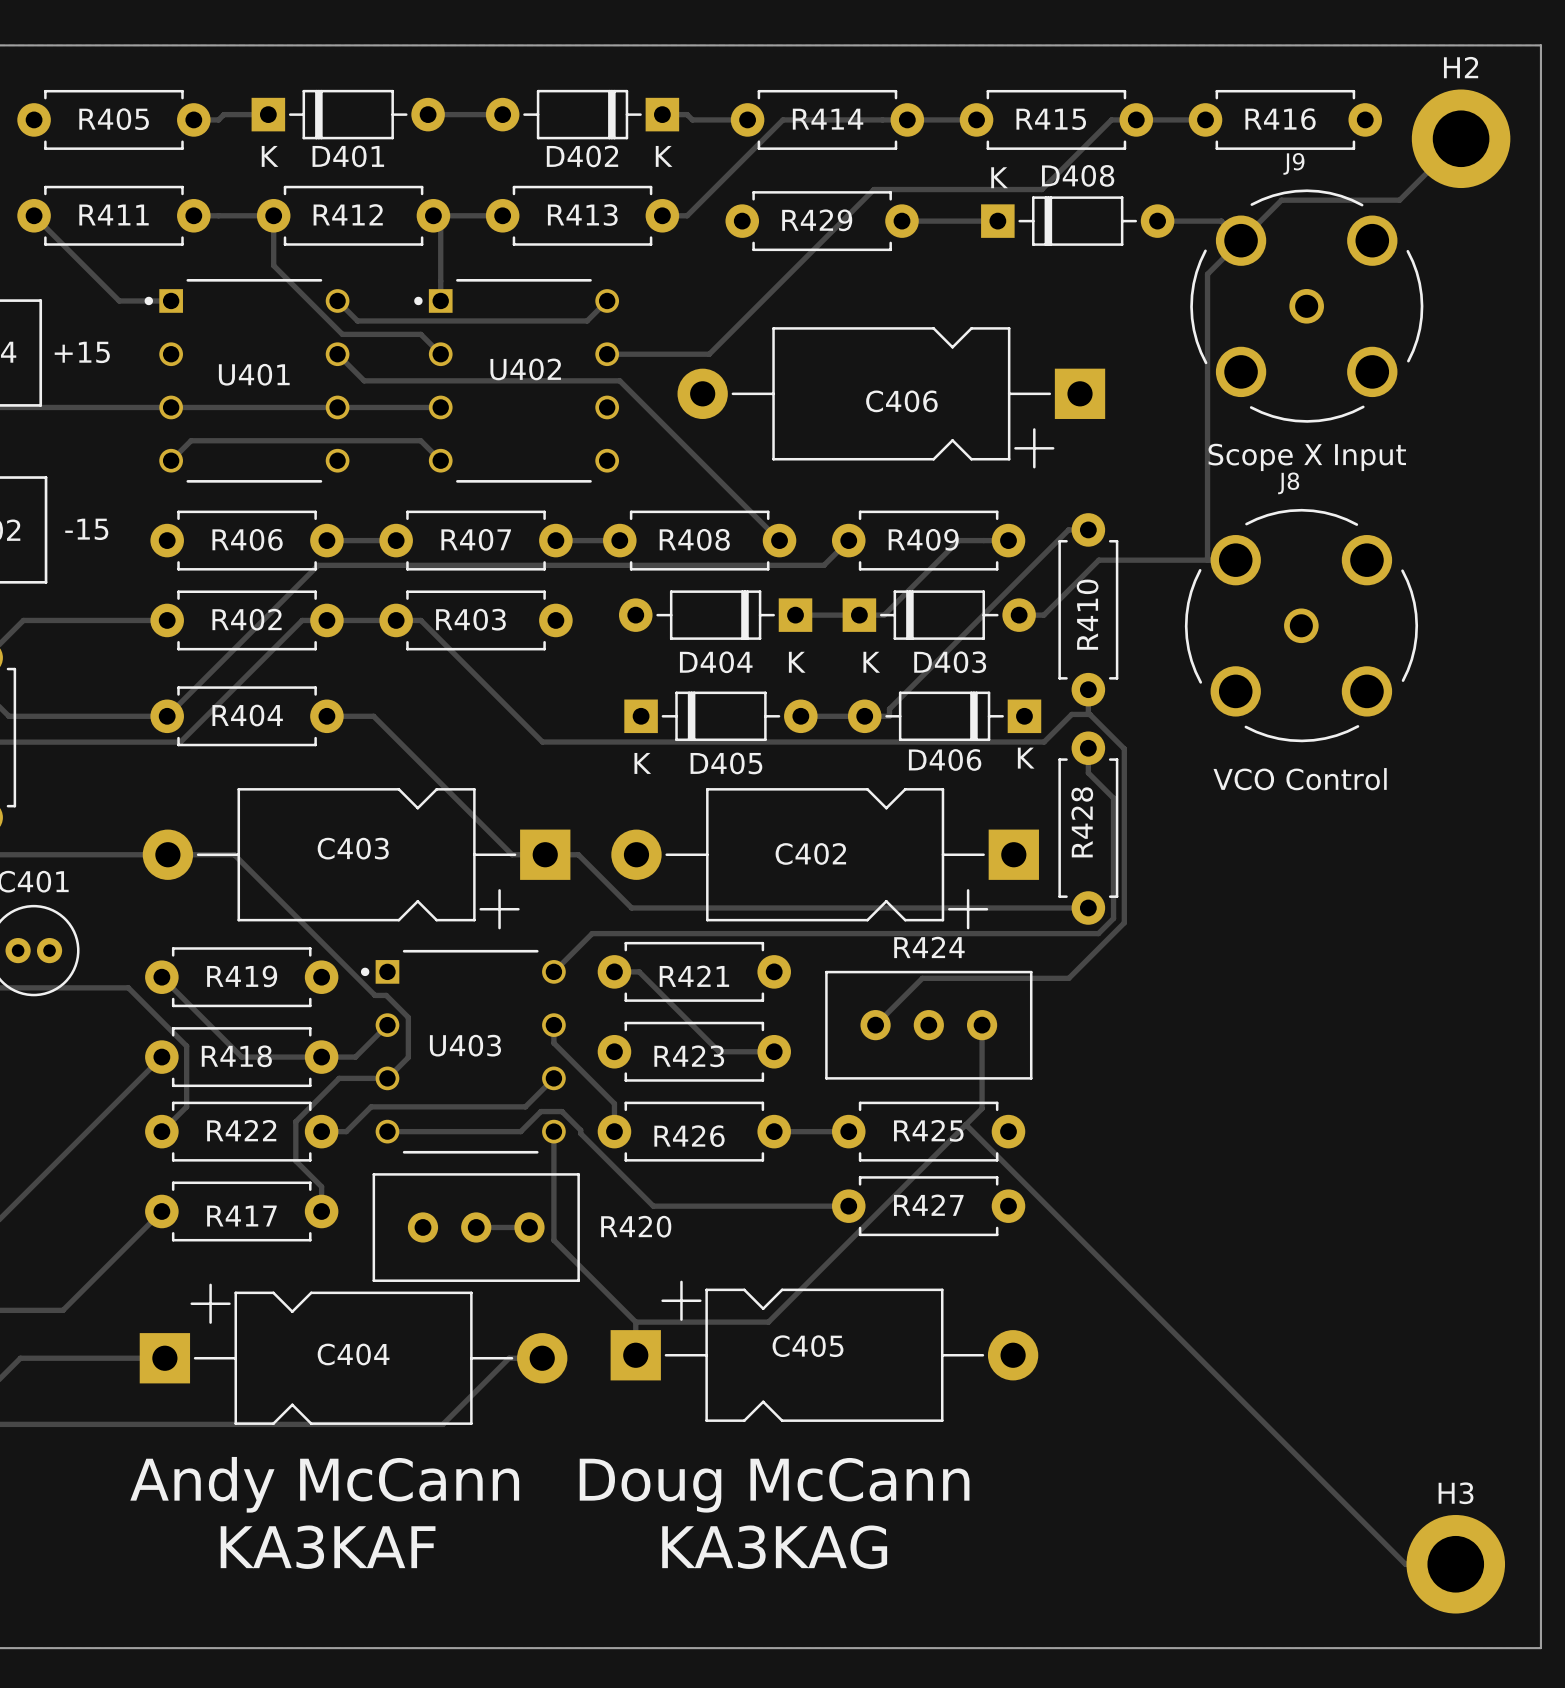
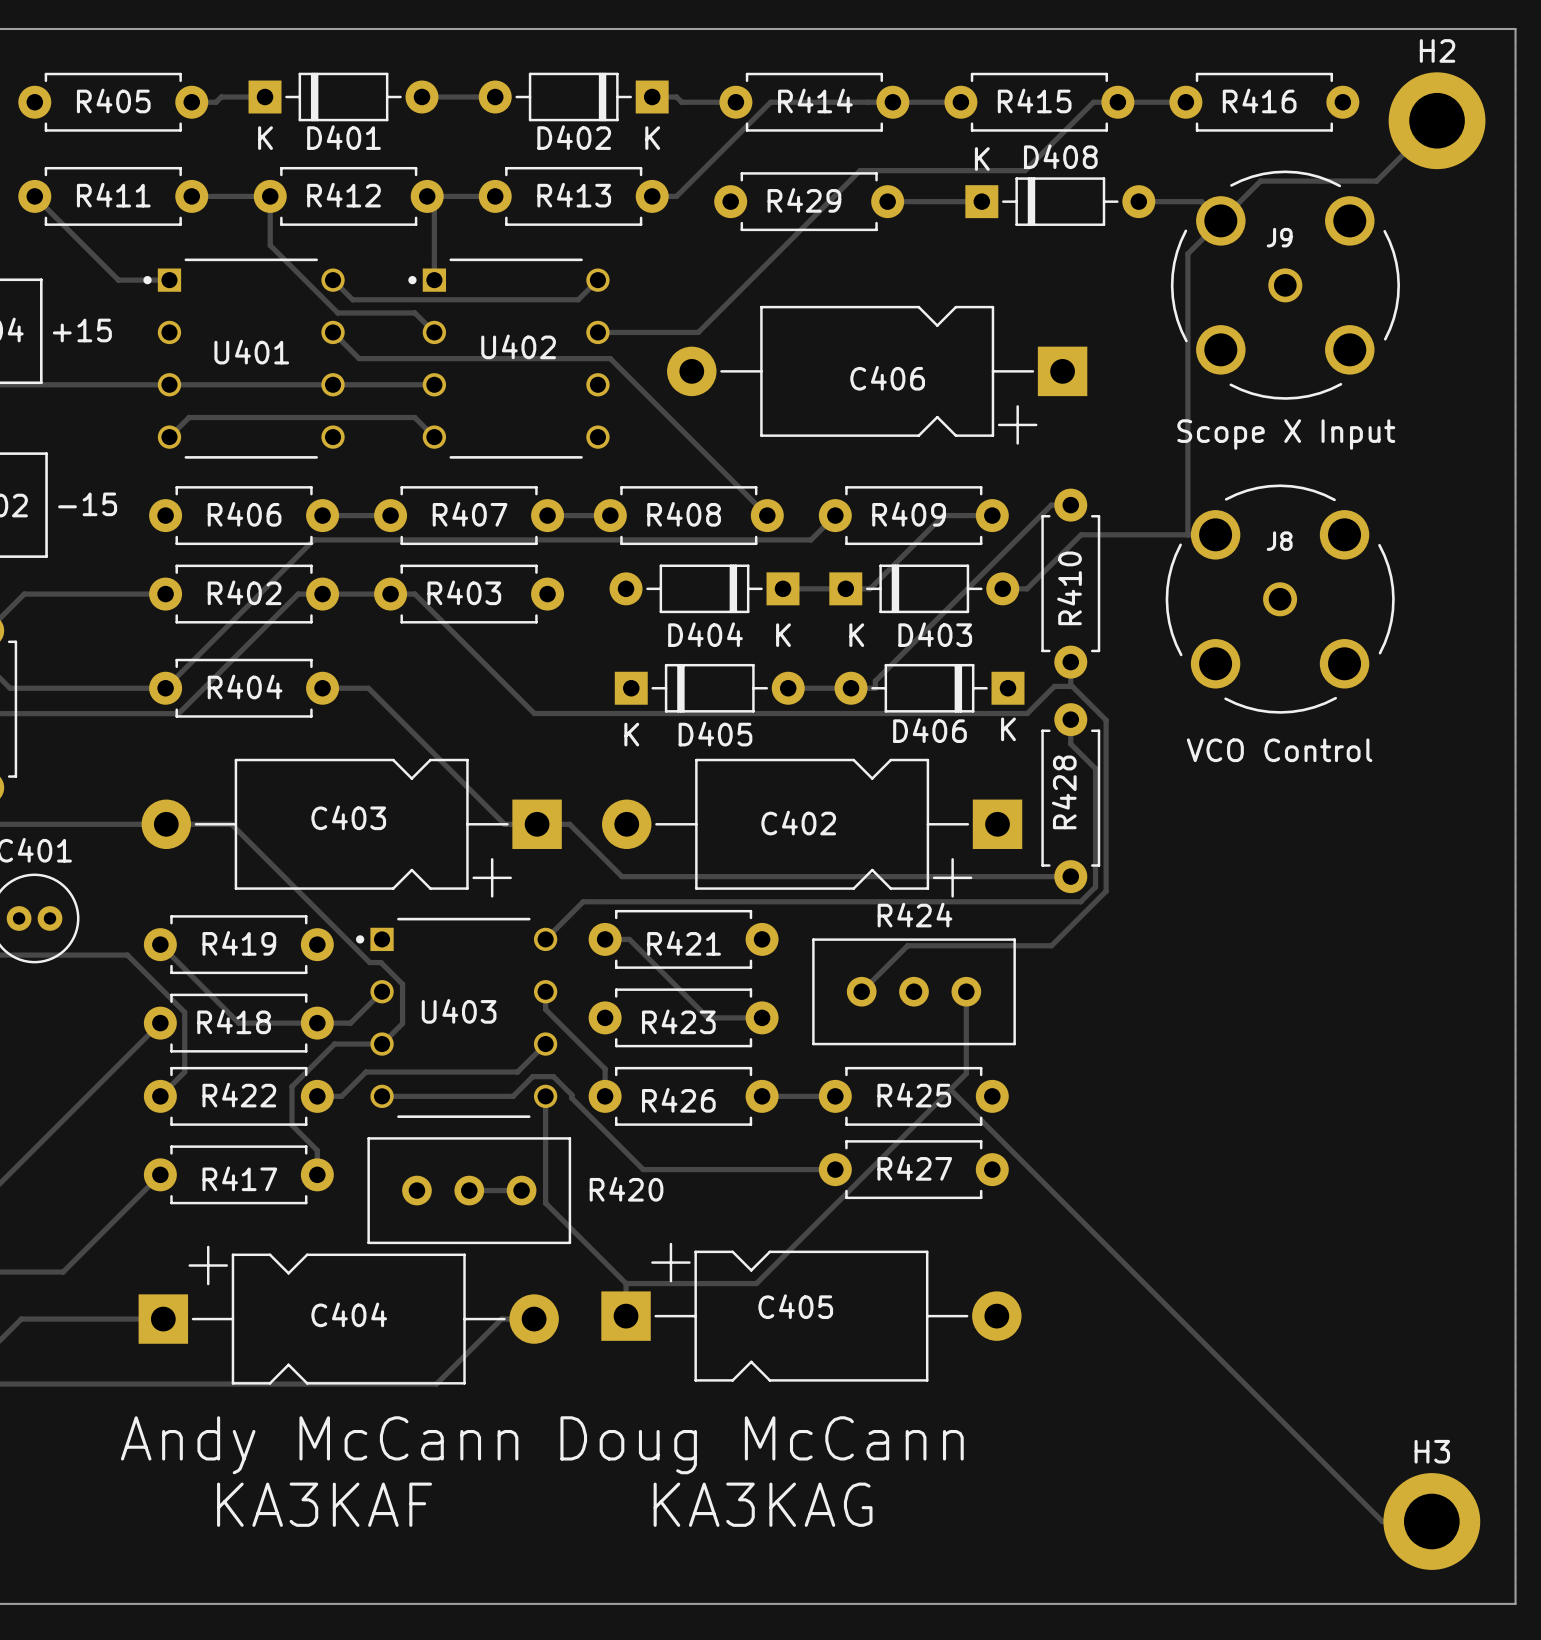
J9 name position: J9 (1293, 163) -> J9 (1279, 237)
J8 name position: J8 (1288, 483) -> J8 (1279, 541)

